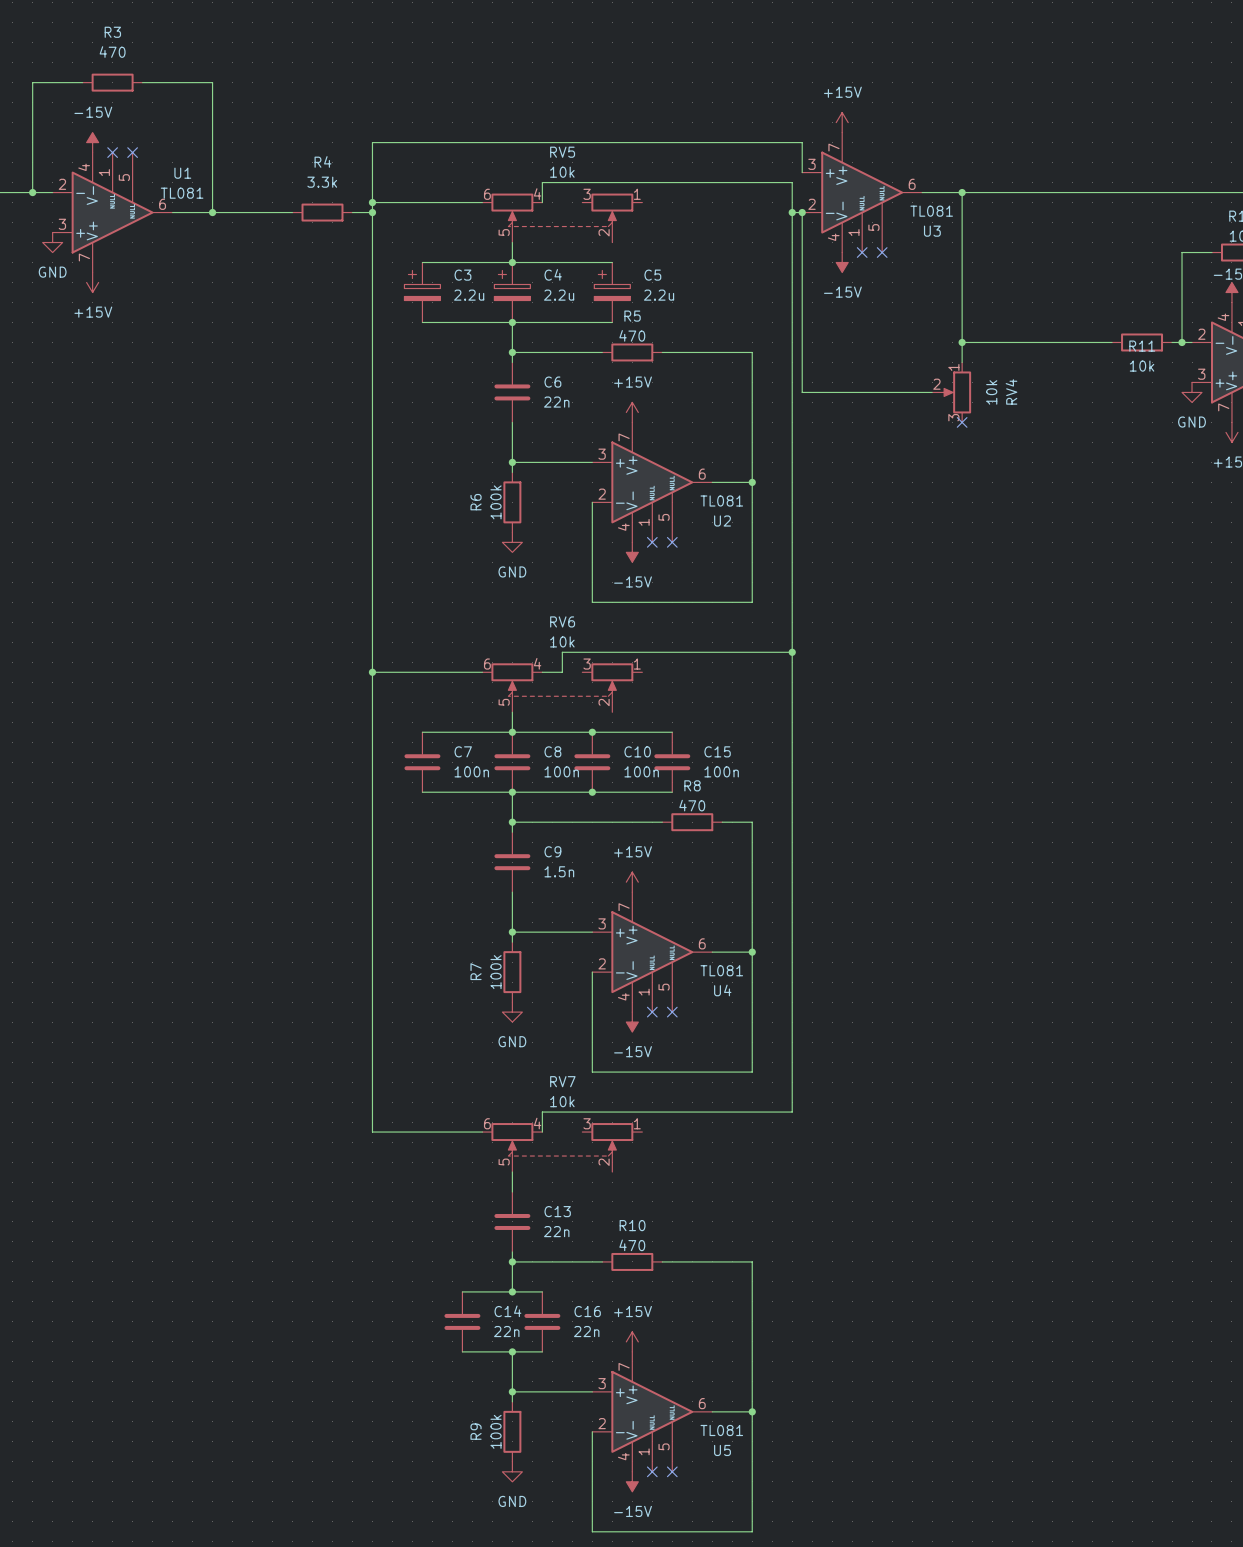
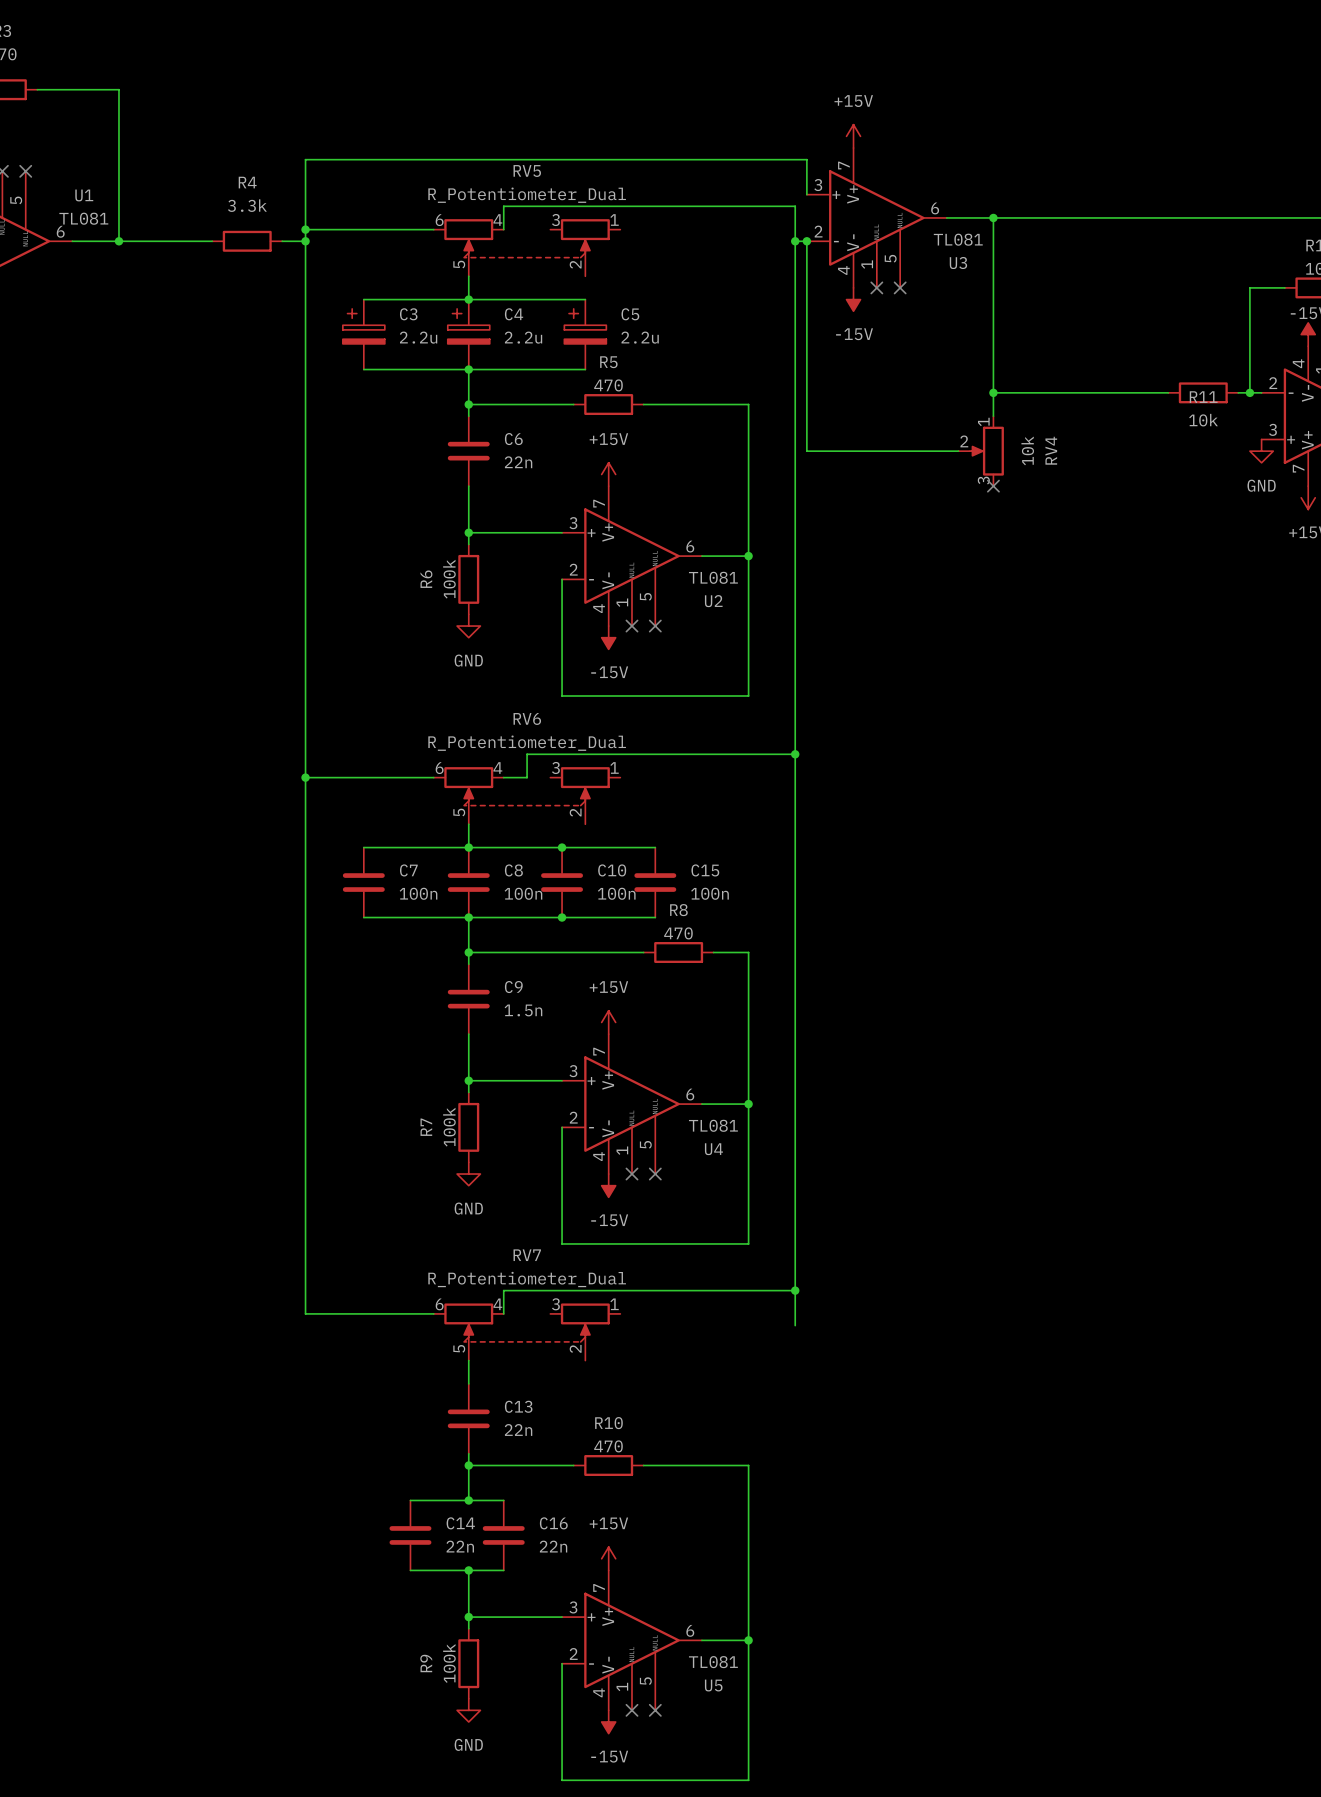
RV5 value: 10k (562, 172) -> R_Potentiometer_Dual (527, 195)
RV6 value: 10k (562, 641) -> R_Potentiometer_Dual (527, 743)
RV7 value: 10k (562, 1101) -> R_Potentiometer_Dual (527, 1279)
wire: none -> (795, 1290) (795, 1325)
junction: none -> (795, 1290)

